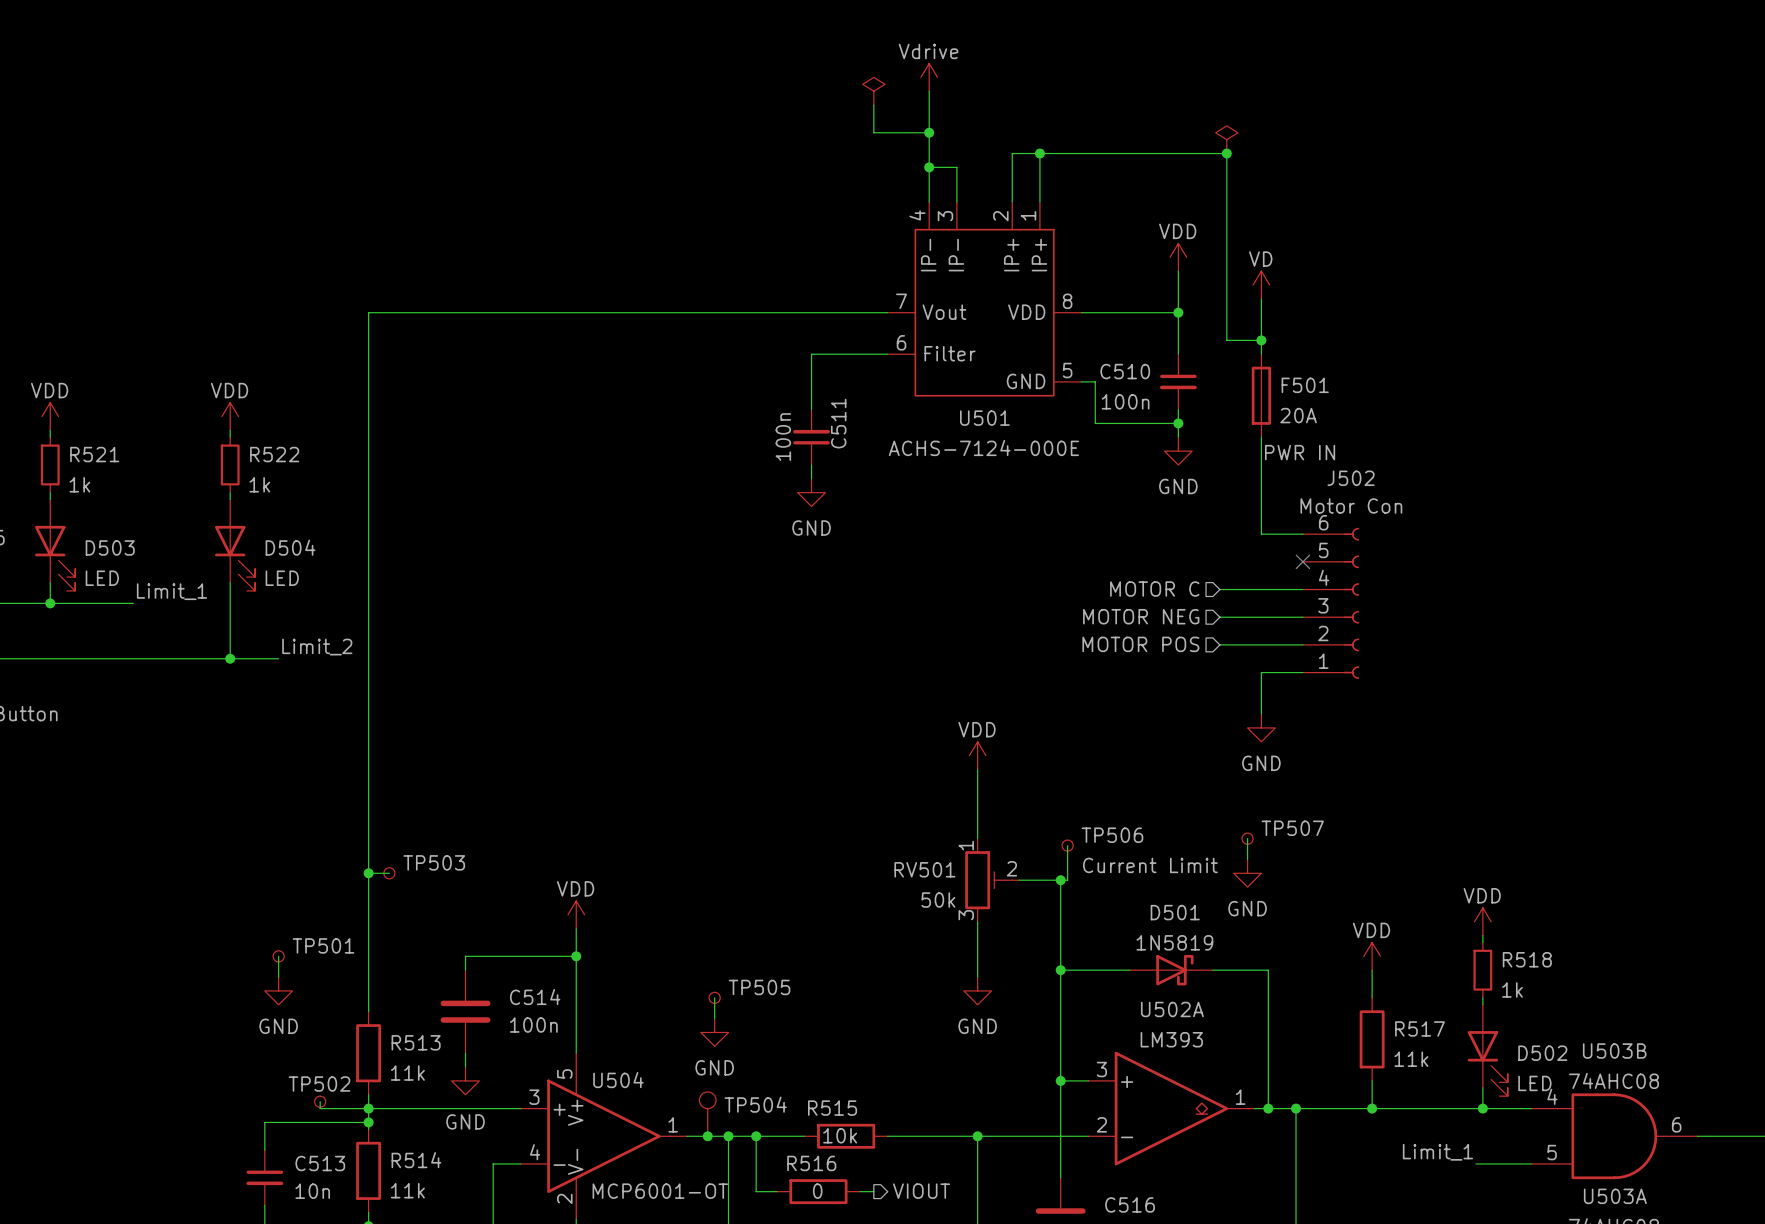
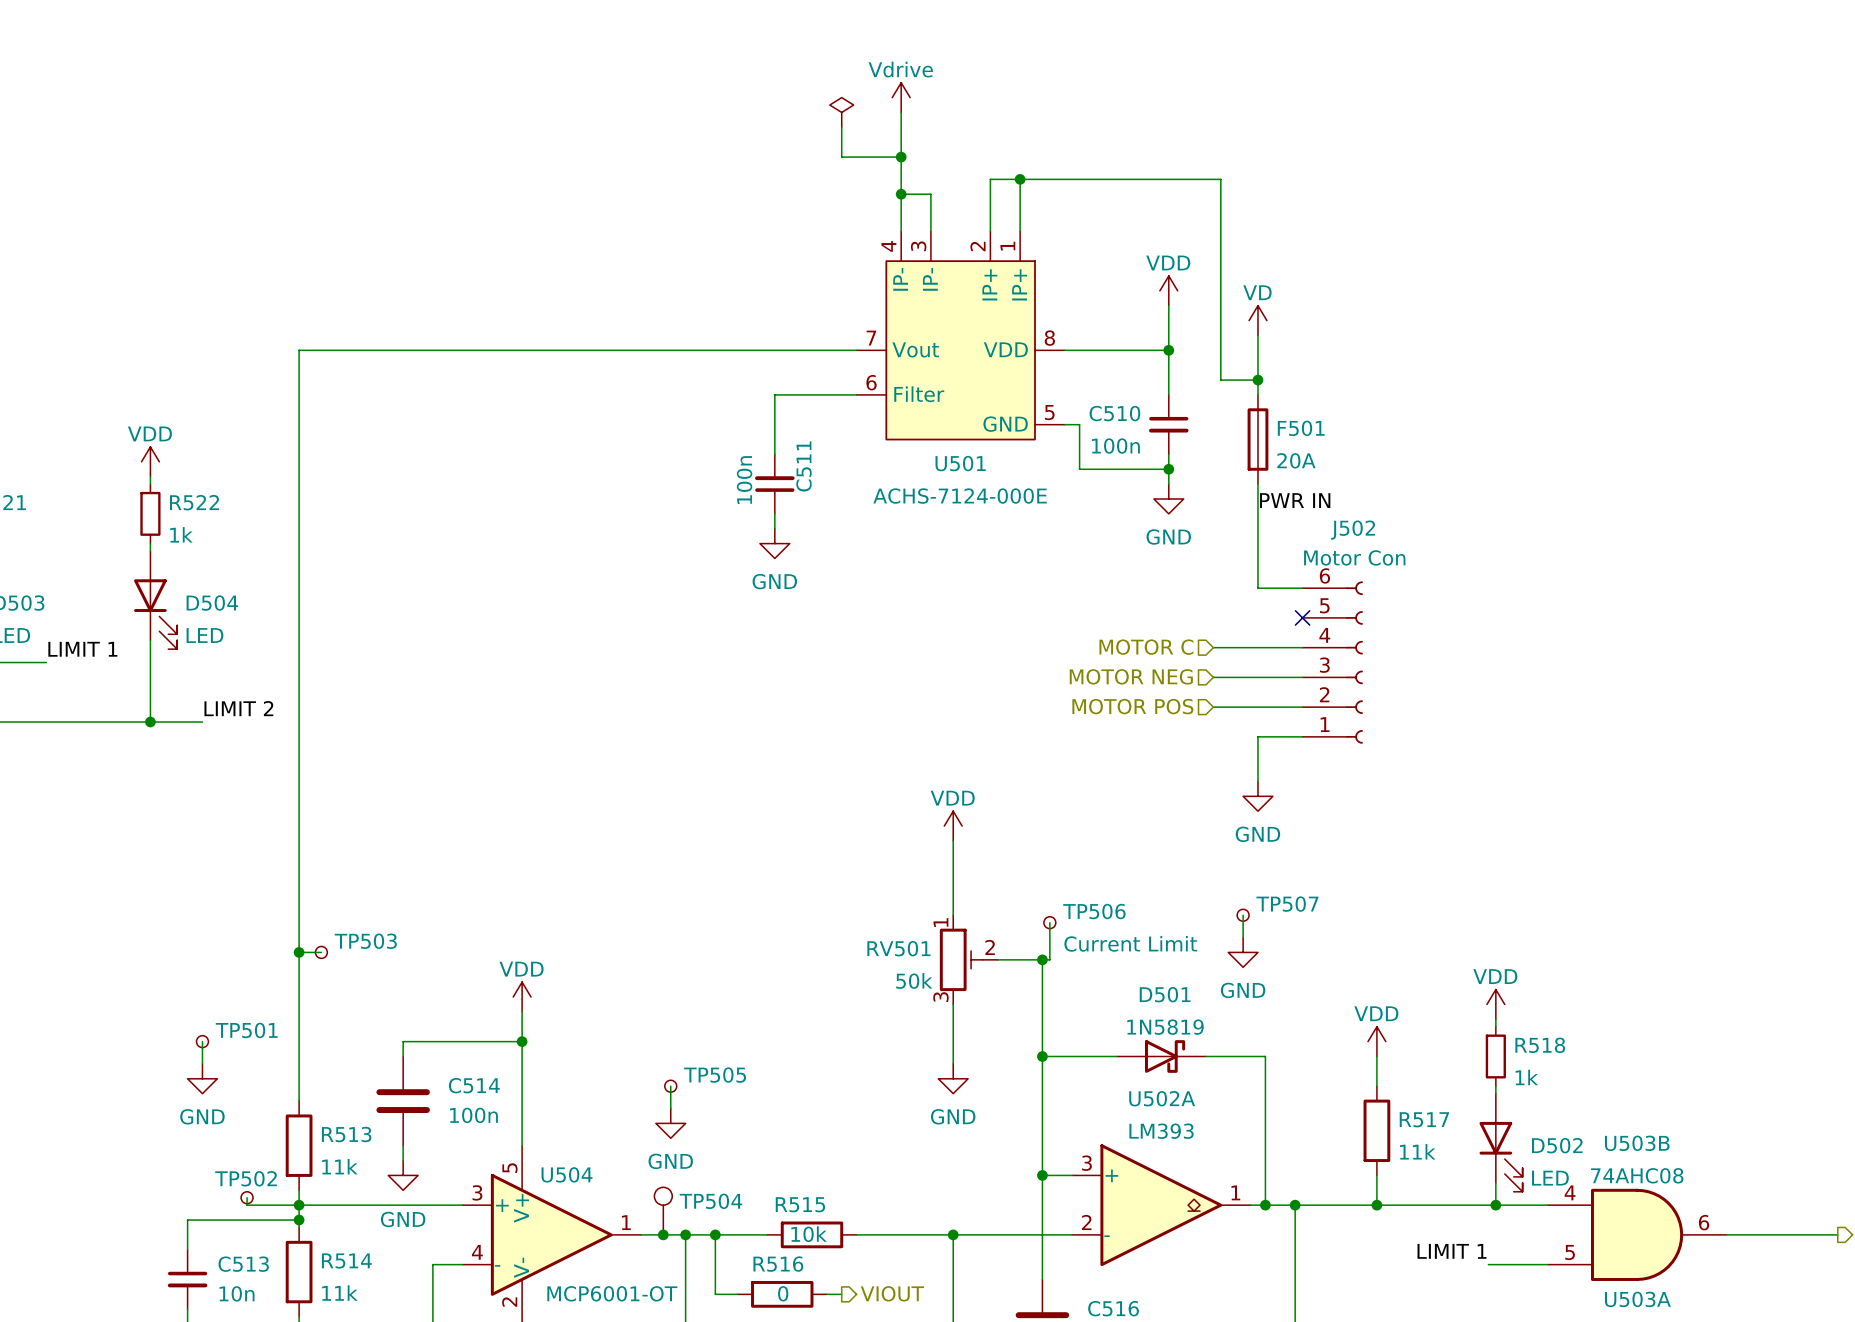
power symbol: (1226, 139) -> none
junction: (1226, 153) -> none
label: Limit_1 (171, 591) -> LIMIT 1 (82, 649)
label: Limit_2 (317, 647) -> LIMIT 2 (238, 708)
label: Limit_1 (1437, 1152) -> LIMIT 1 (1452, 1251)

